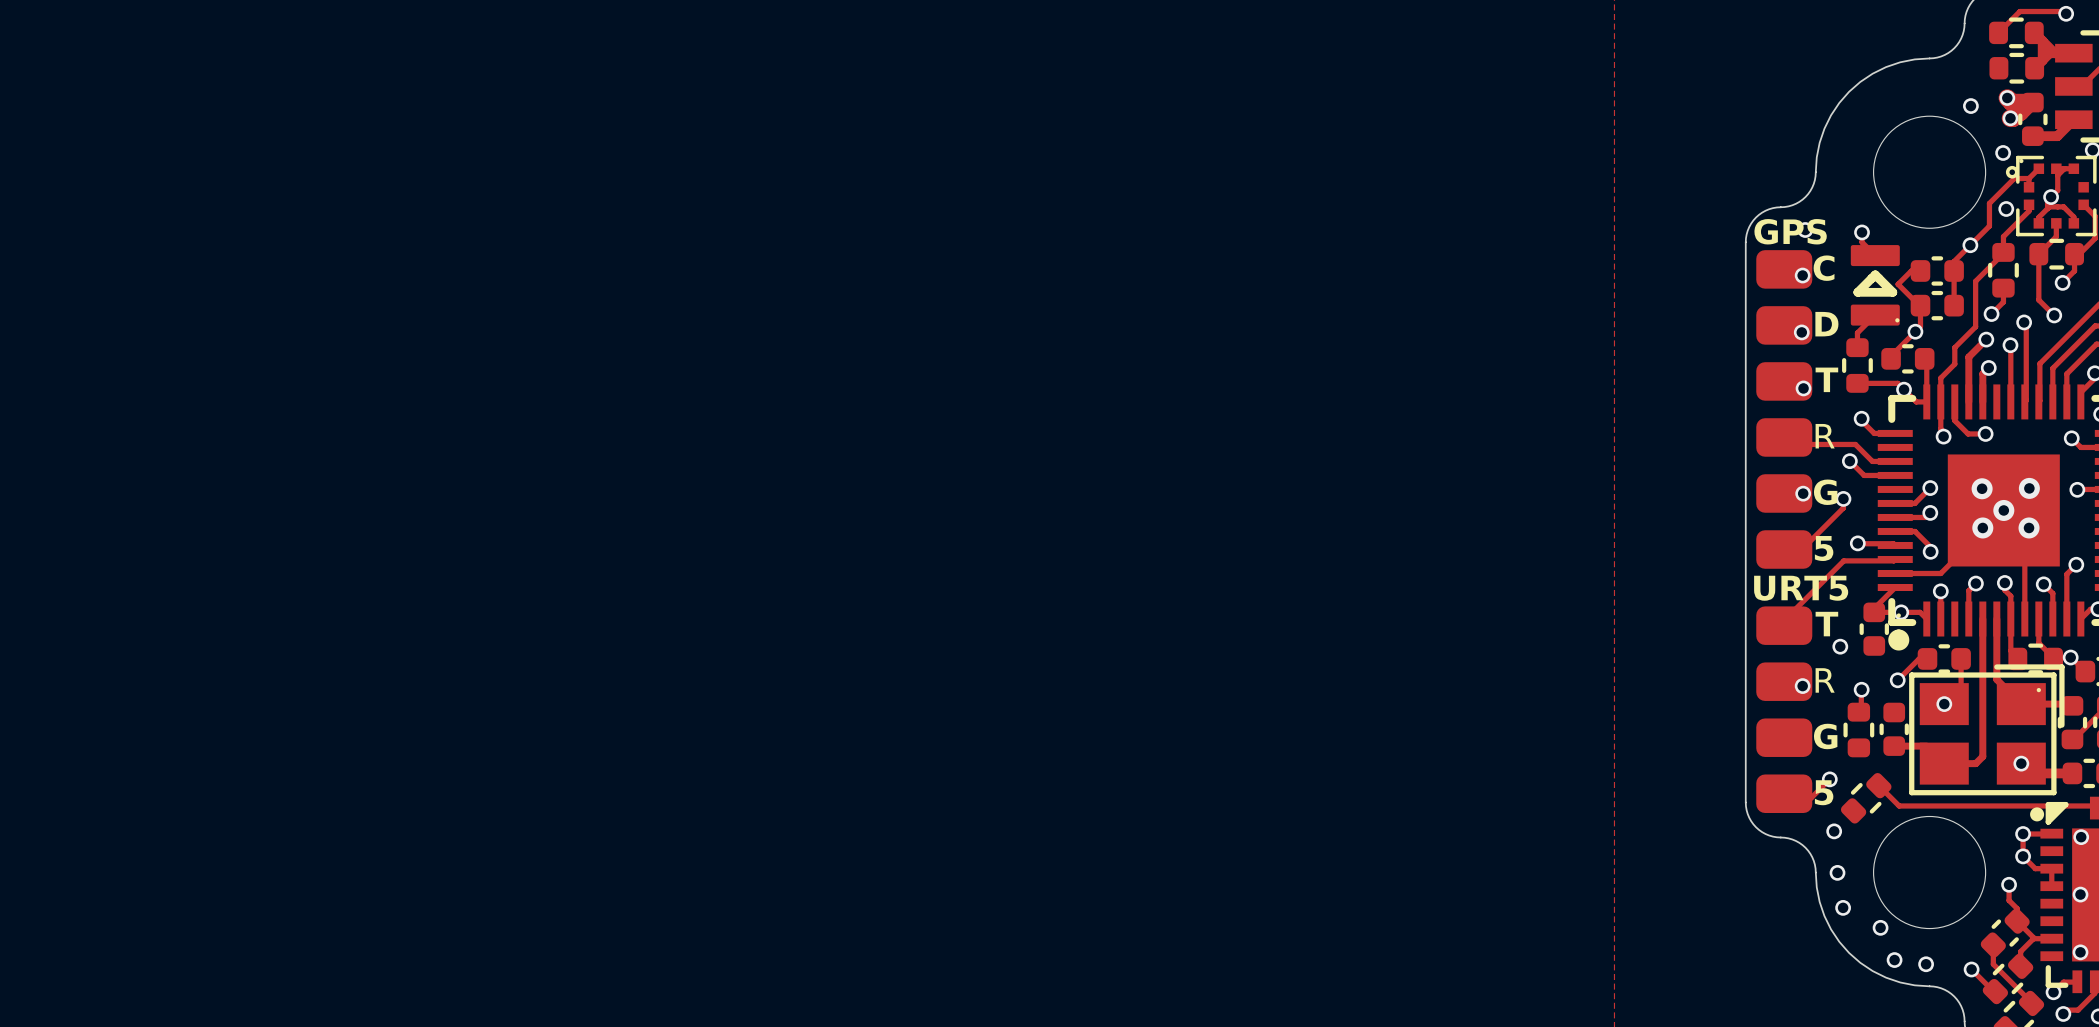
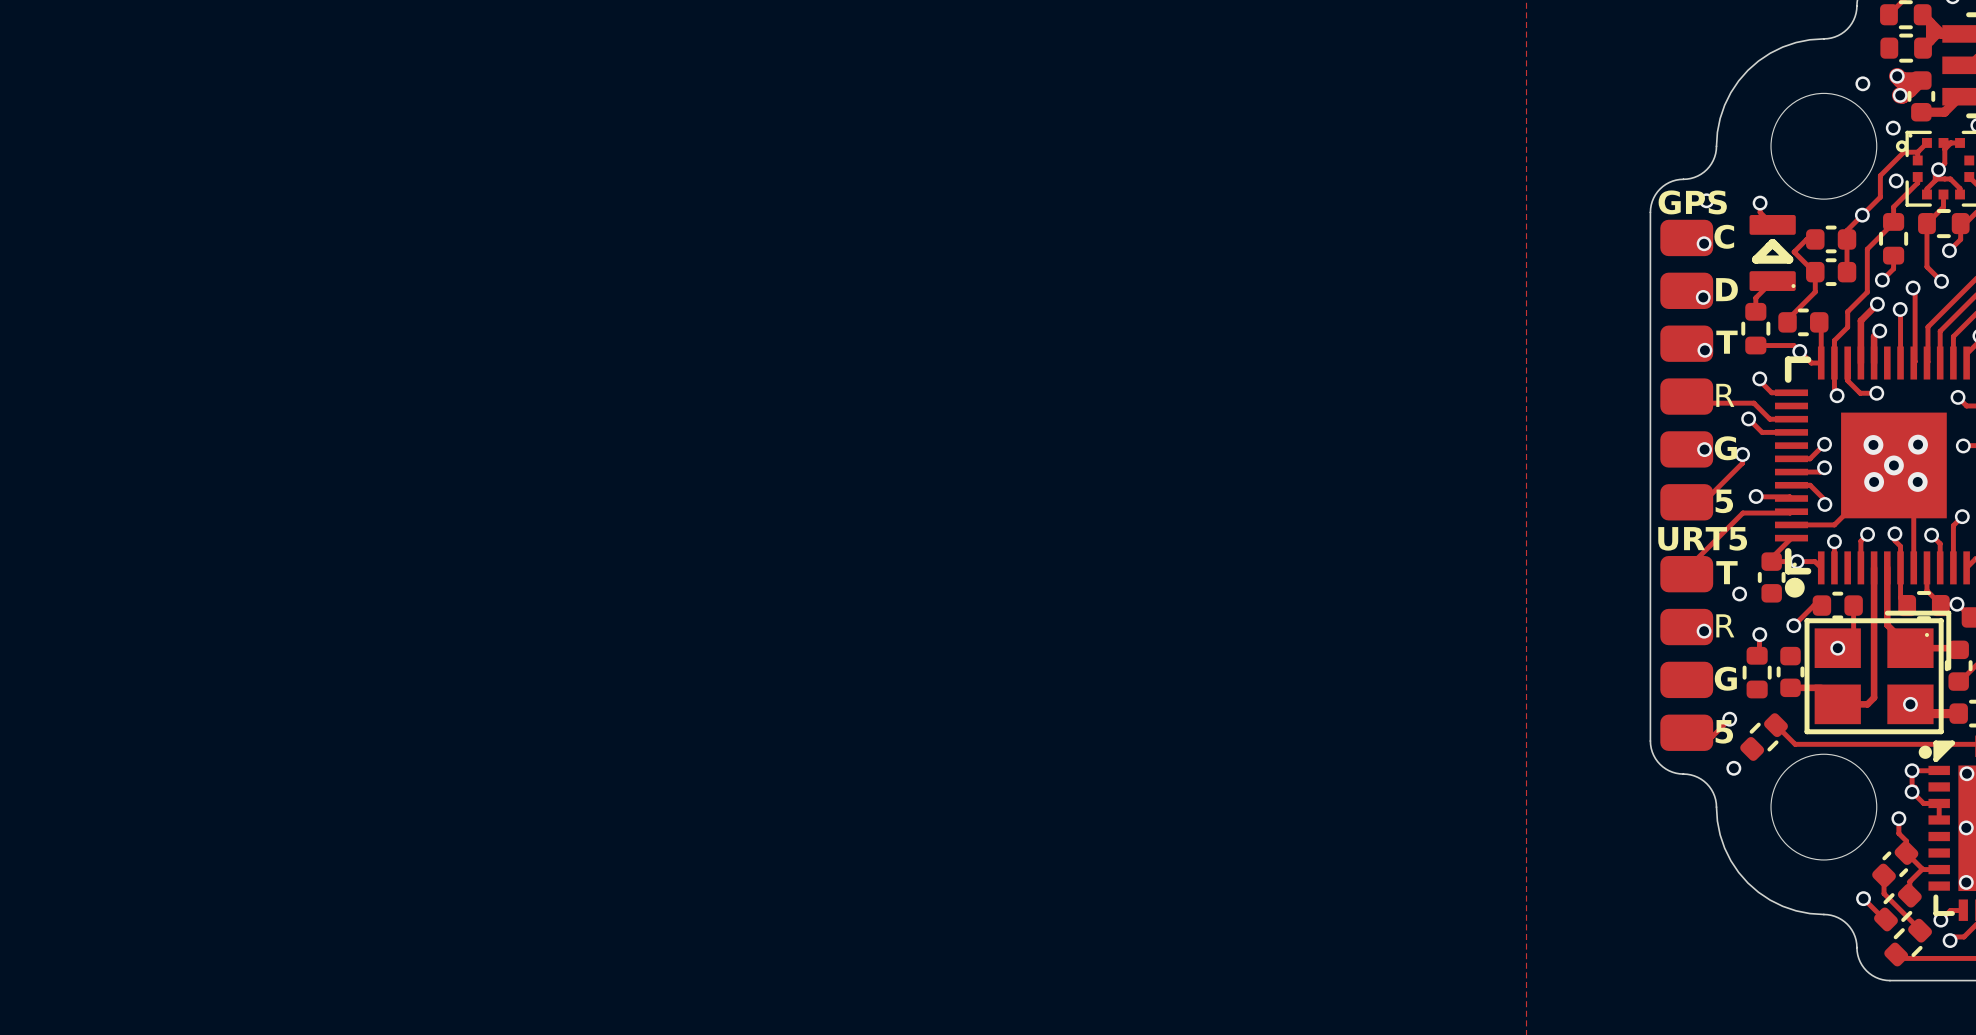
via: (1915, 331) -> none
via: (1837, 872) -> none
via: (1843, 907) -> none
via: (1880, 927) -> none
via: (1894, 960) -> none
via: (1926, 964) -> none

